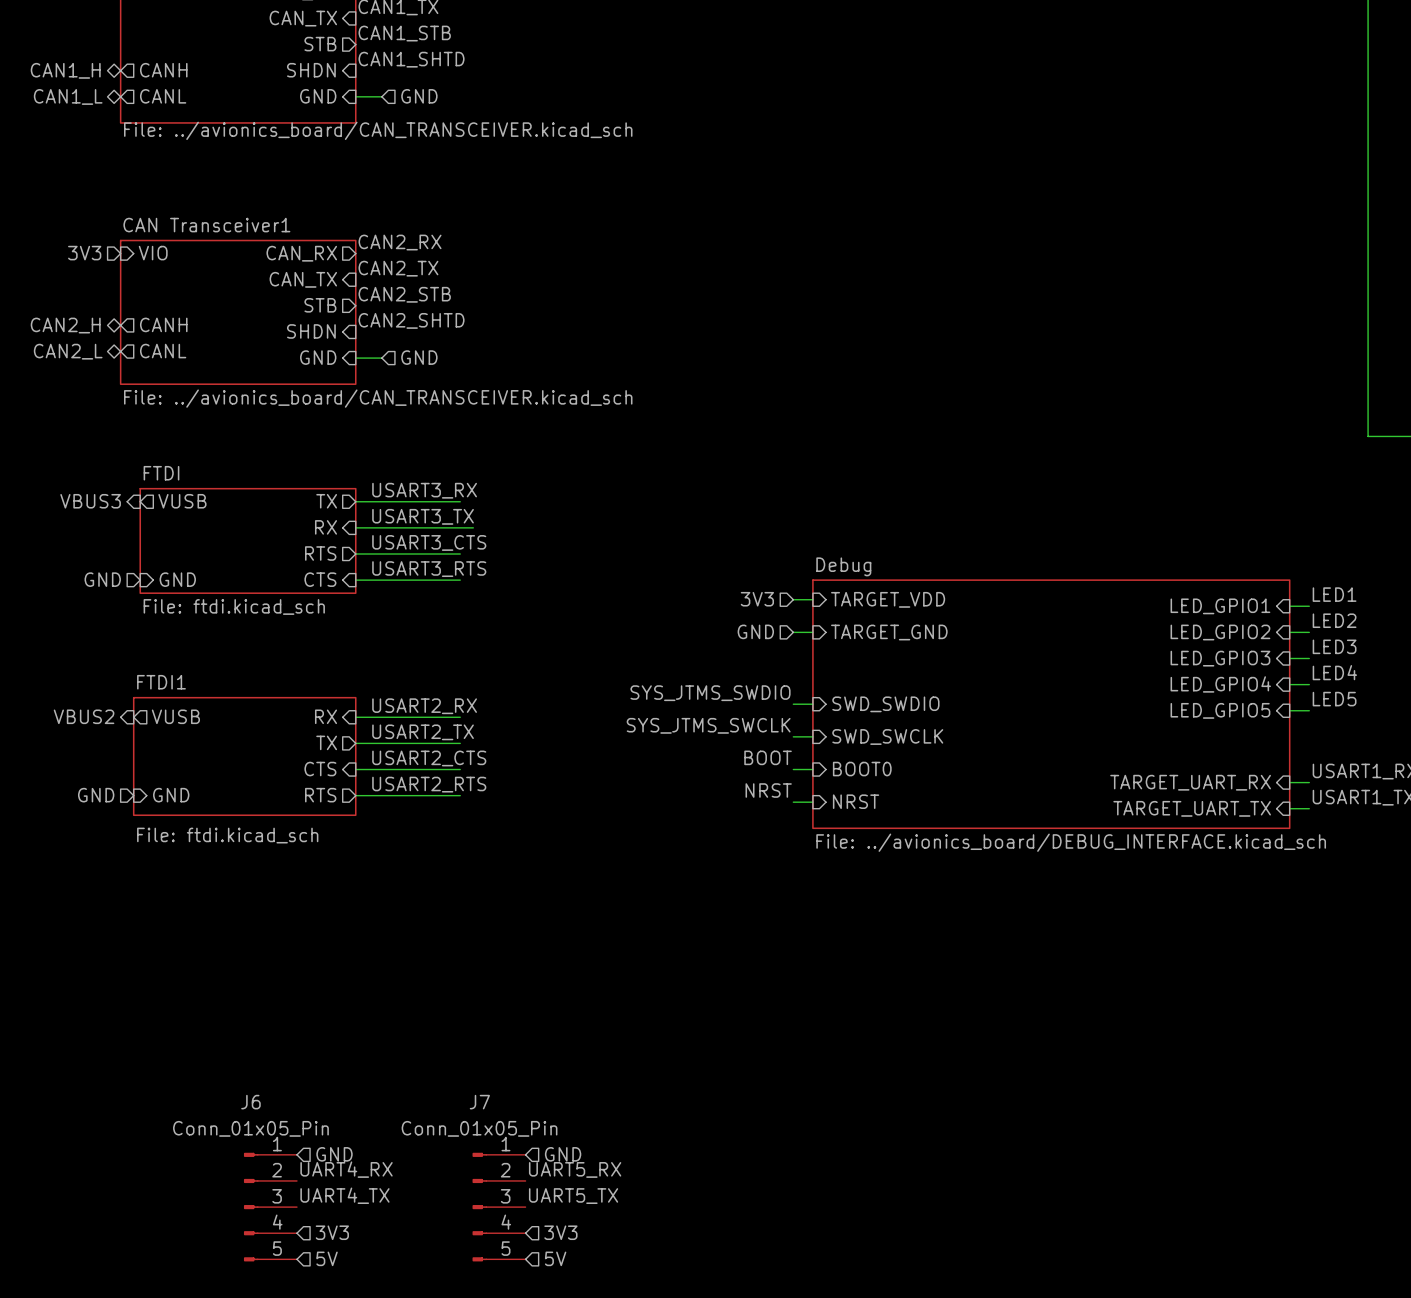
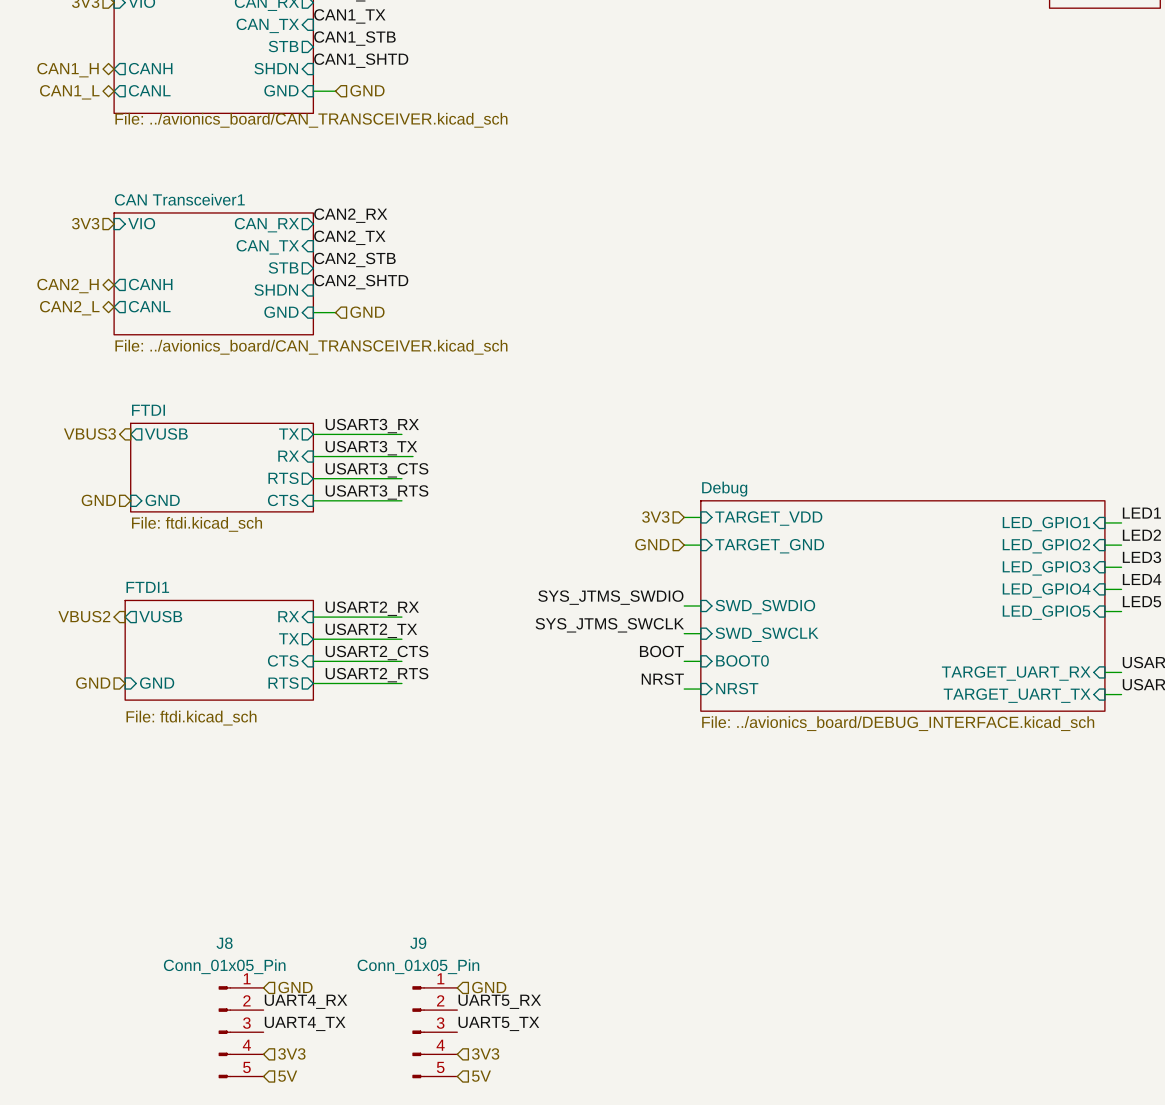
J6 name: J6 (250, 1102) -> J8 (224, 943)
J7 name: J7 (479, 1102) -> J9 (418, 943)

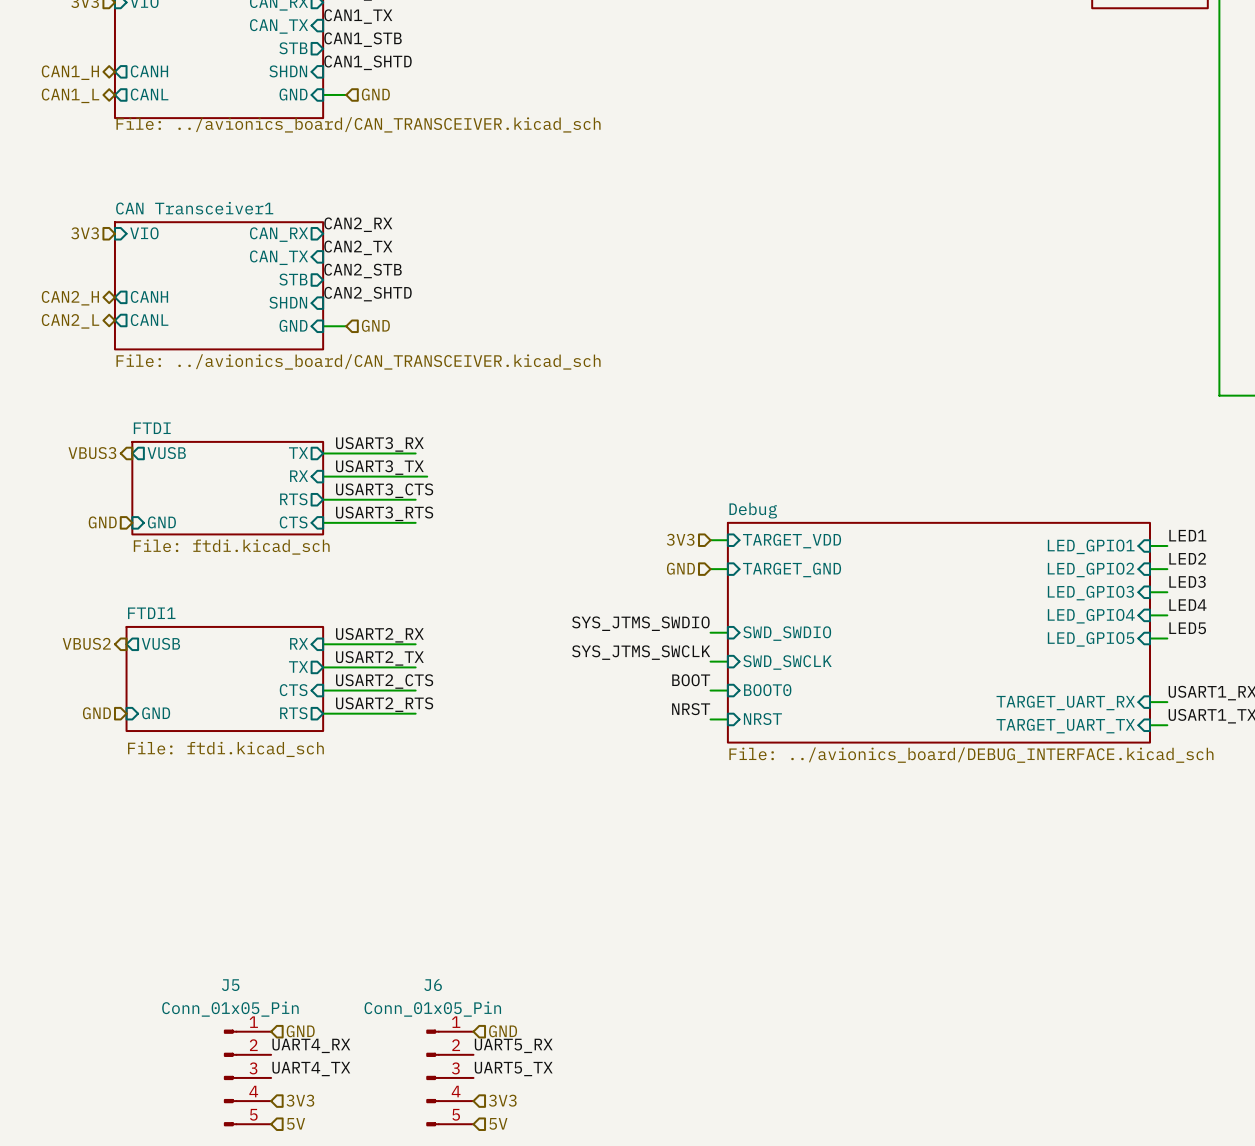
J8 name: J8 (224, 943) -> J5 (230, 985)
J9 name: J9 (418, 943) -> J6 (433, 985)

